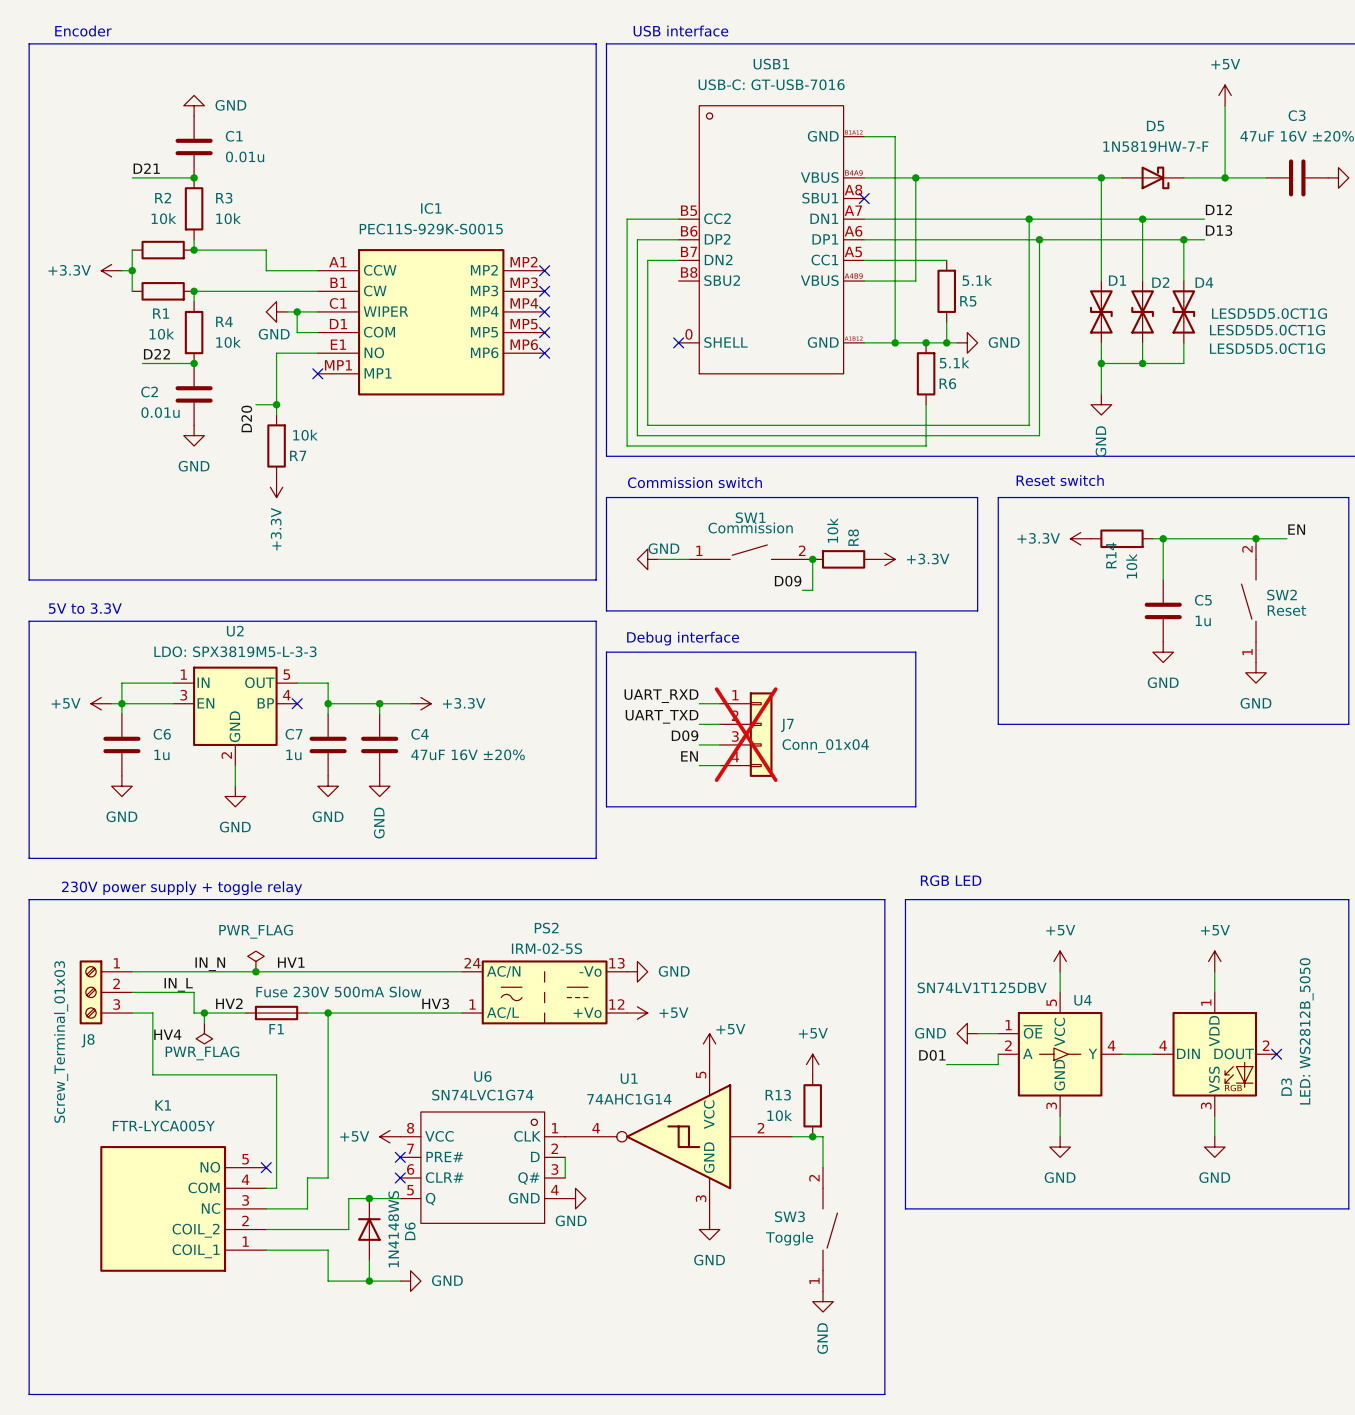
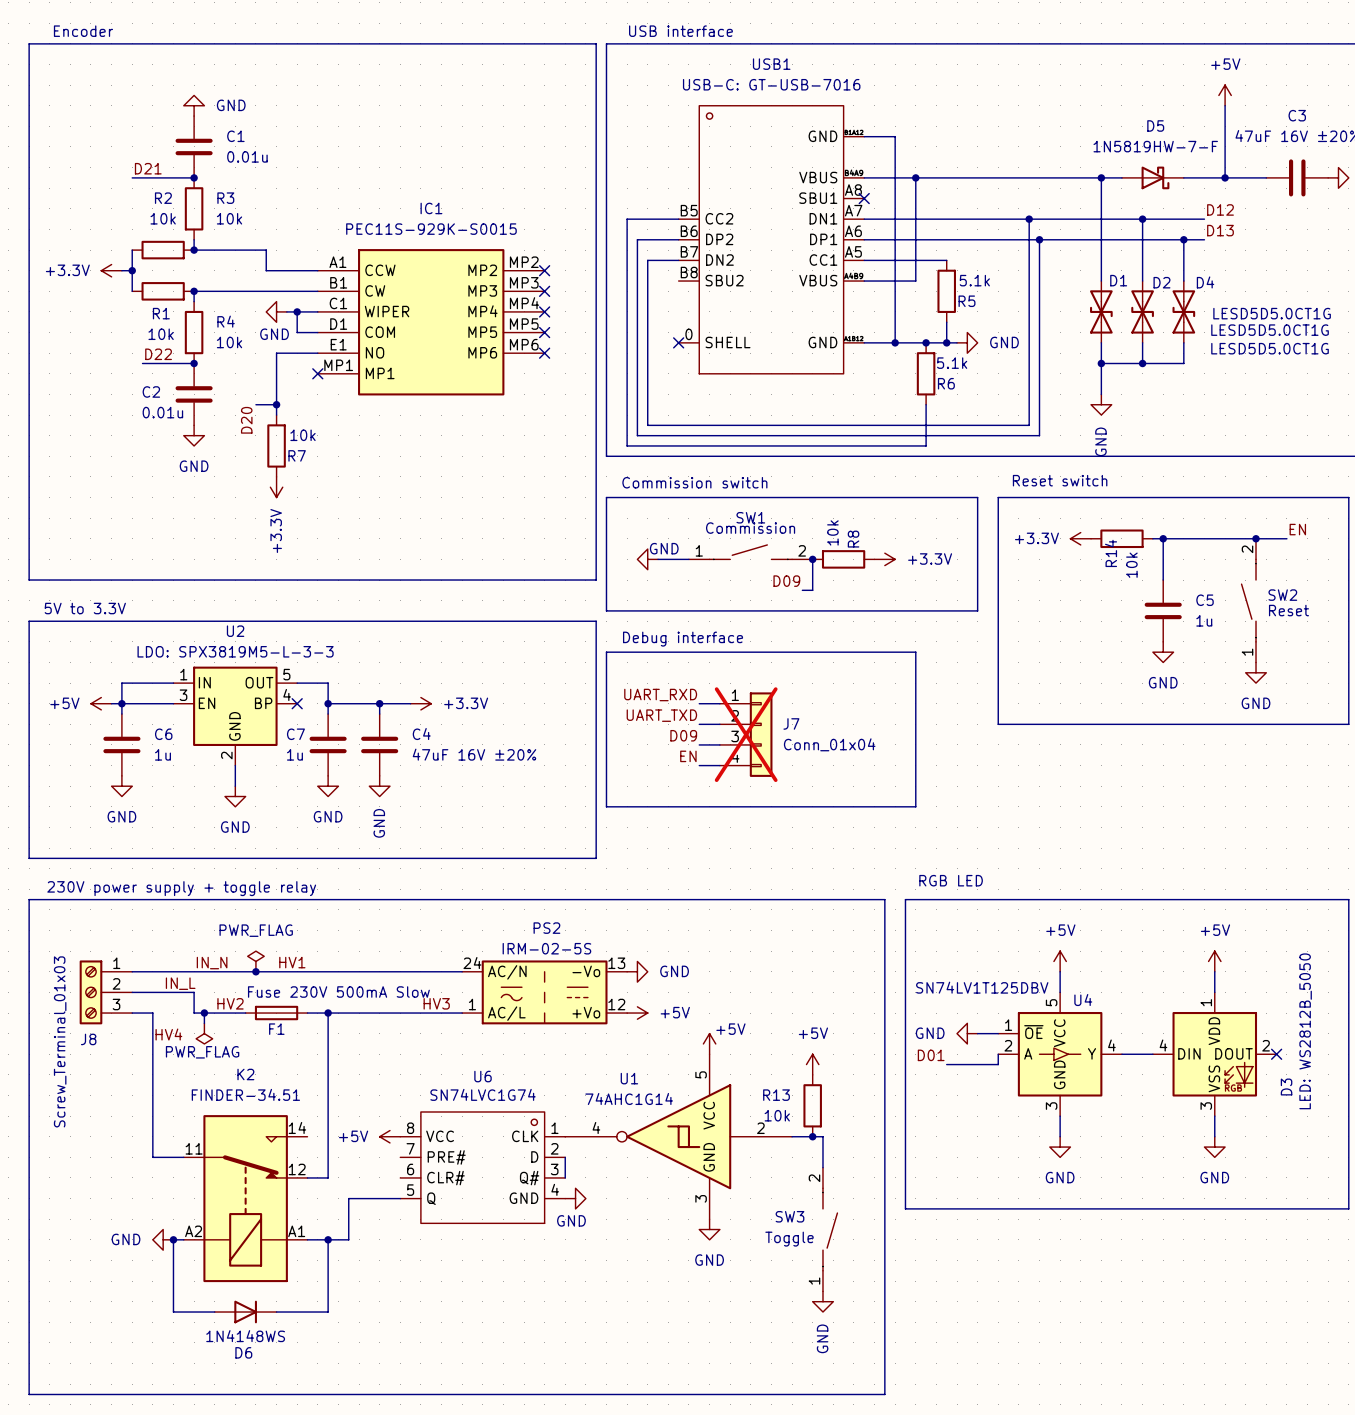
wire: (152, 1074) (276, 1074) (276, 1188) (266, 1188) -> (152, 1074) (152, 1157) (183, 1157)
no-connect mark: (400, 1157) -> none
no-connect mark: (266, 1167) -> none
wire: (307, 1177) (307, 1208) (266, 1208) -> none
no-connect mark: (400, 1177) -> none
K2: none -> FINDER-34.51 (245, 1198)
junction: (369, 1198) -> none
K1: FTR-LYCA005Y (183, 1208) -> none
wire: (266, 1229) (348, 1229) -> (307, 1239) (348, 1239) (348, 1229)
D6 rotation: 0° (369, 1229) -> 90° clockwise (245, 1312)
D6 position: (369, 1229) -> (245, 1312)
power symbol: none -> GND (163, 1239)
junction: none -> (173, 1239)
wire: none -> (183, 1239) (173, 1239) (173, 1312) (214, 1312)
junction: none -> (328, 1239)
wire: (266, 1250) (328, 1250) -> (328, 1239) (328, 1250)
wire: (369, 1260) (369, 1281) -> none
wire: (328, 1281) (400, 1281) -> (328, 1281) (328, 1312) (276, 1312)
junction: (369, 1281) -> none
power symbol: GND (410, 1281) -> none

